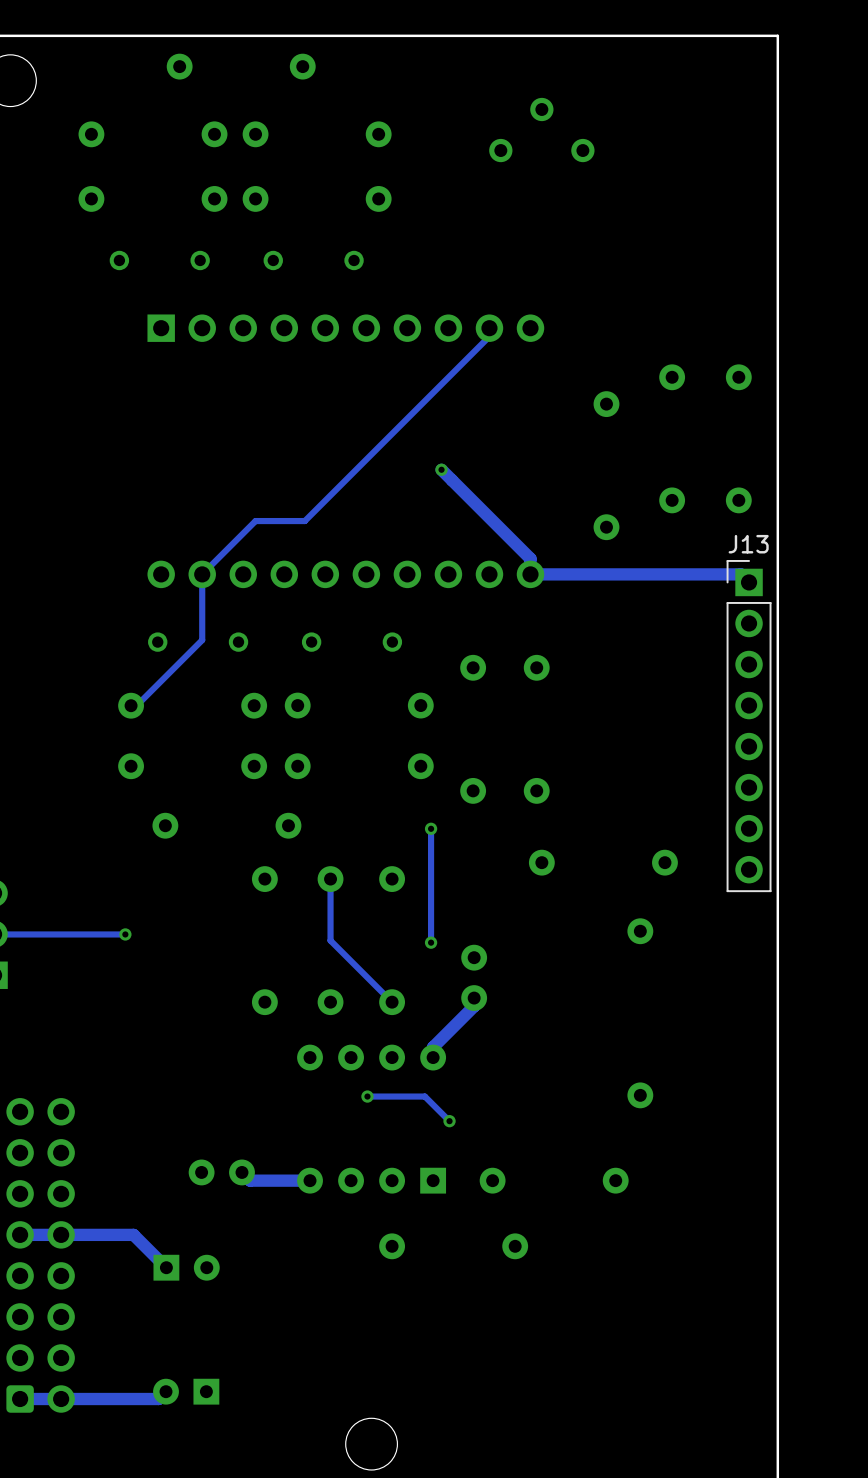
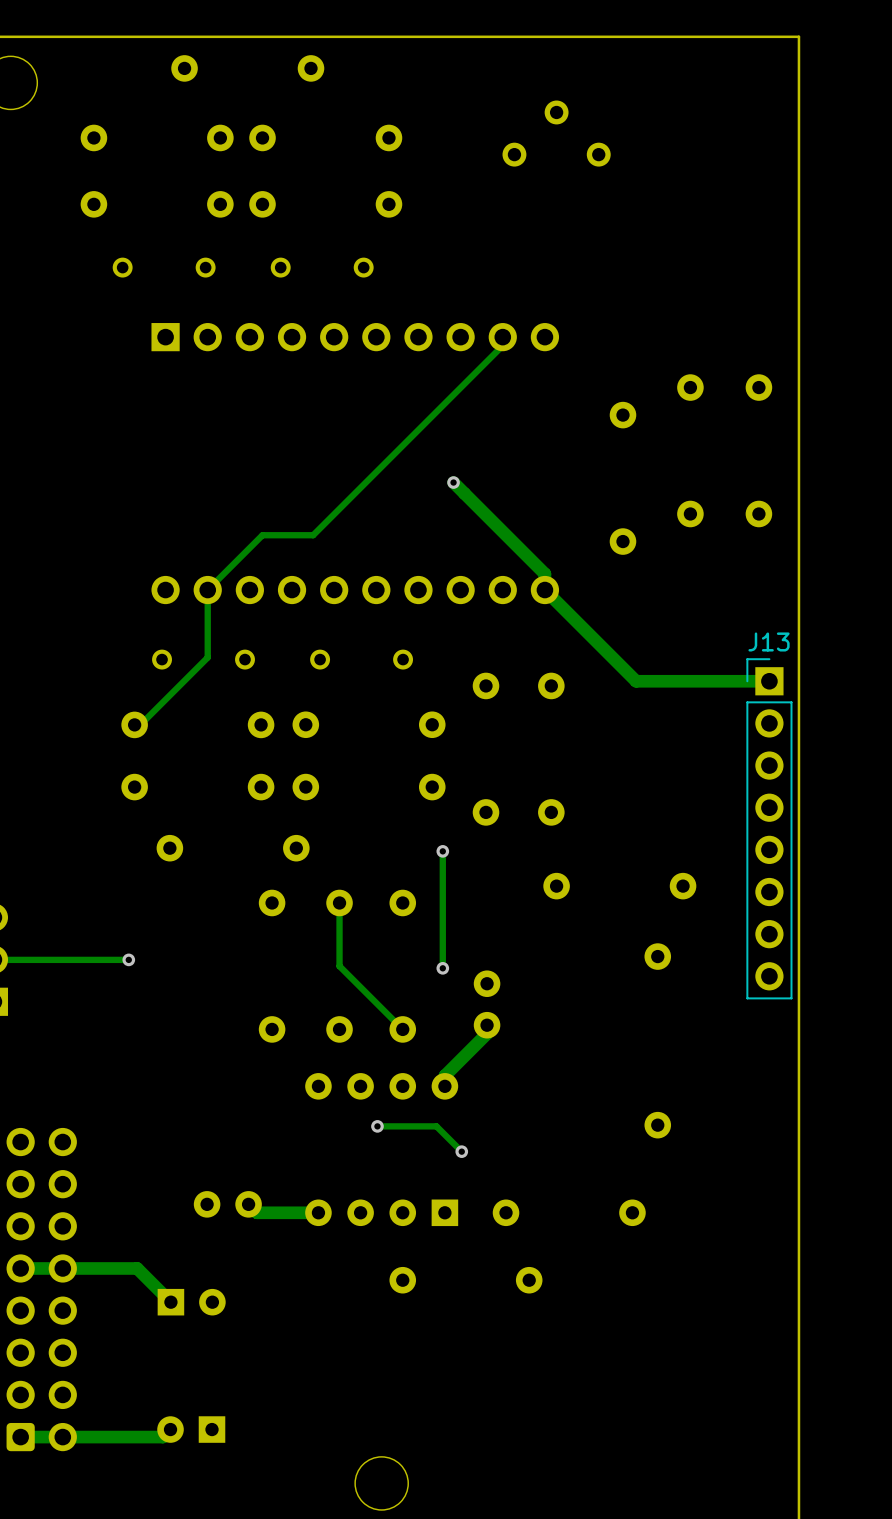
track: (530, 574) (740, 574) (749, 582) -> (544, 590) (636, 681) (769, 681)
J13 position: (749, 726) -> (769, 828)

